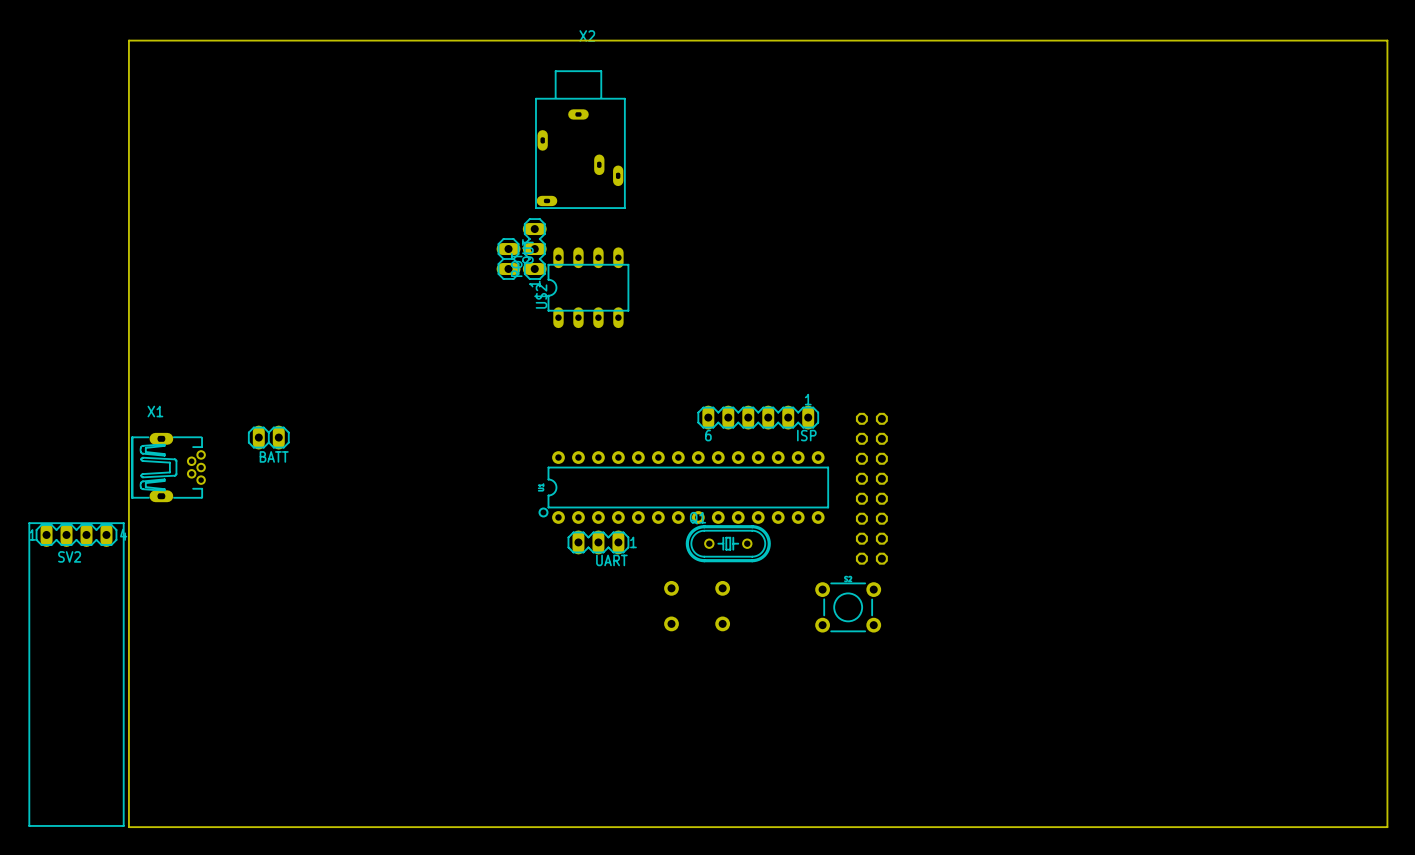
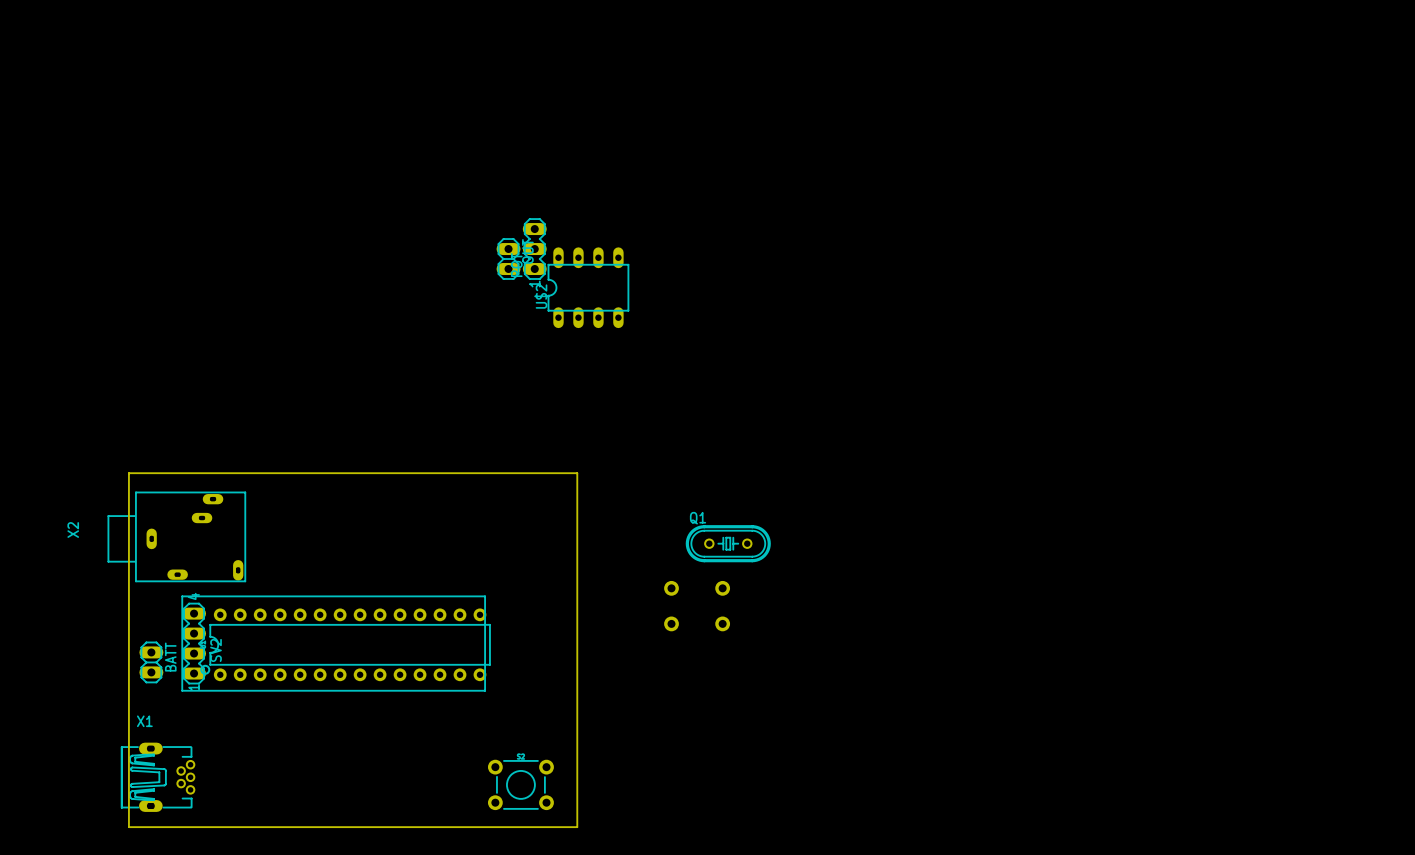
X2 rotation: 0° (580, 139) -> 90° counterclockwise (176, 536)
X2 position: (580, 139) -> (176, 536)
ISP: (758, 417) -> none
BATT: (268, 437) -> none
X1 position: (168, 467) -> (158, 777)
board edge: (128, 473) (128, 40) (1387, 40) (1387, 827) (577, 827) -> (128, 473) (577, 473) (577, 827)
part position: (683, 487) -> (345, 644)
part: (871, 488) -> none
UART: (598, 542) -> none
part position: (848, 607) -> (520, 784)
BATT: none -> (151, 662)
SV2 rotation: 0° (76, 674) -> 90° counterclockwise (333, 643)
SV2 position: (76, 674) -> (333, 643)

